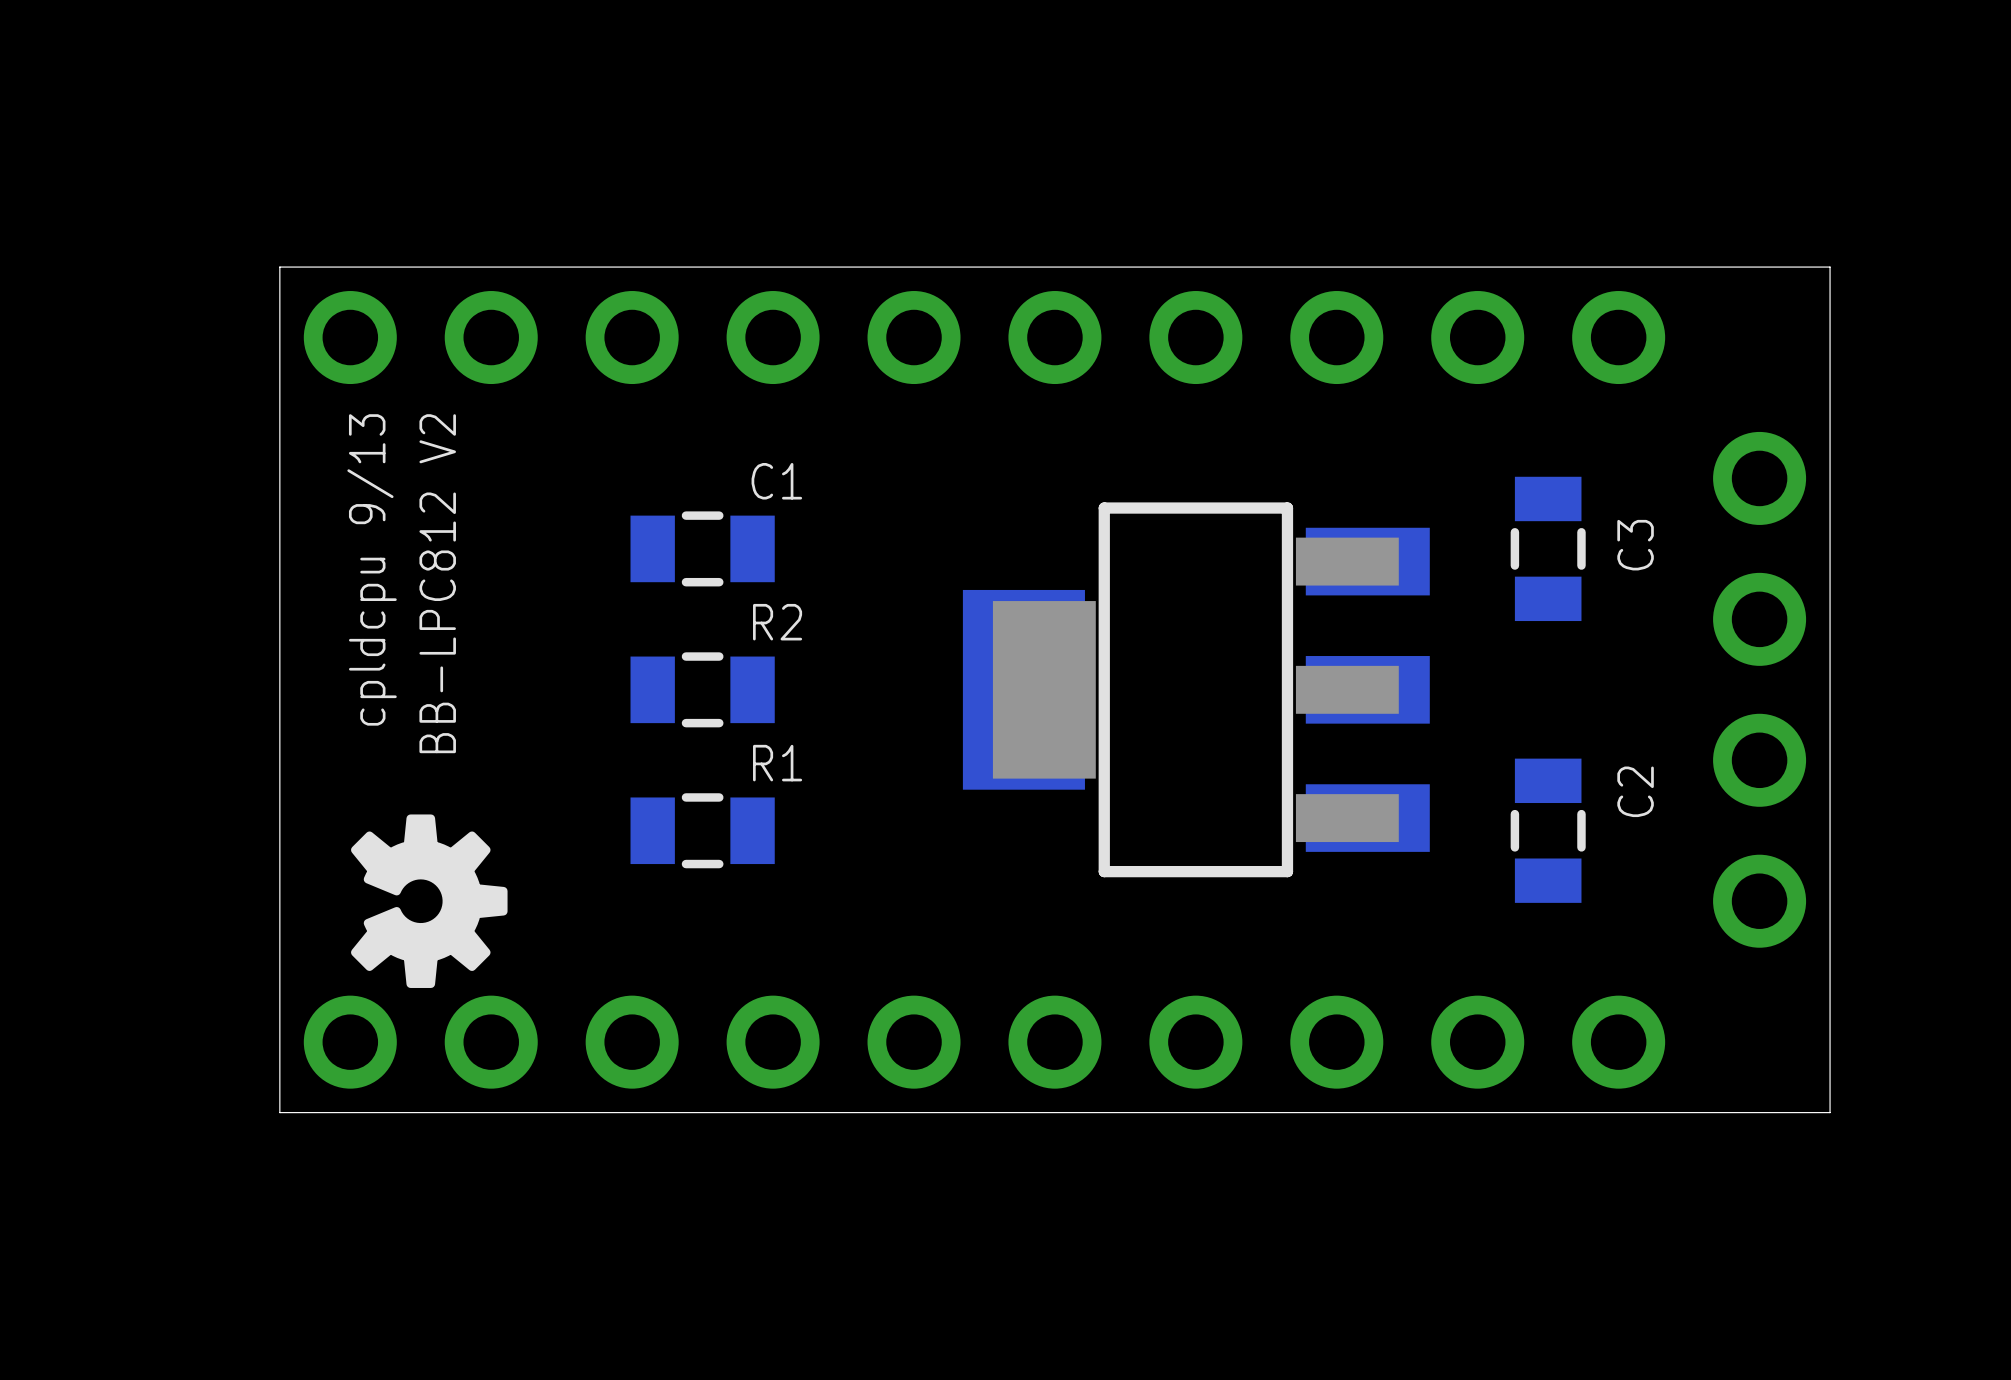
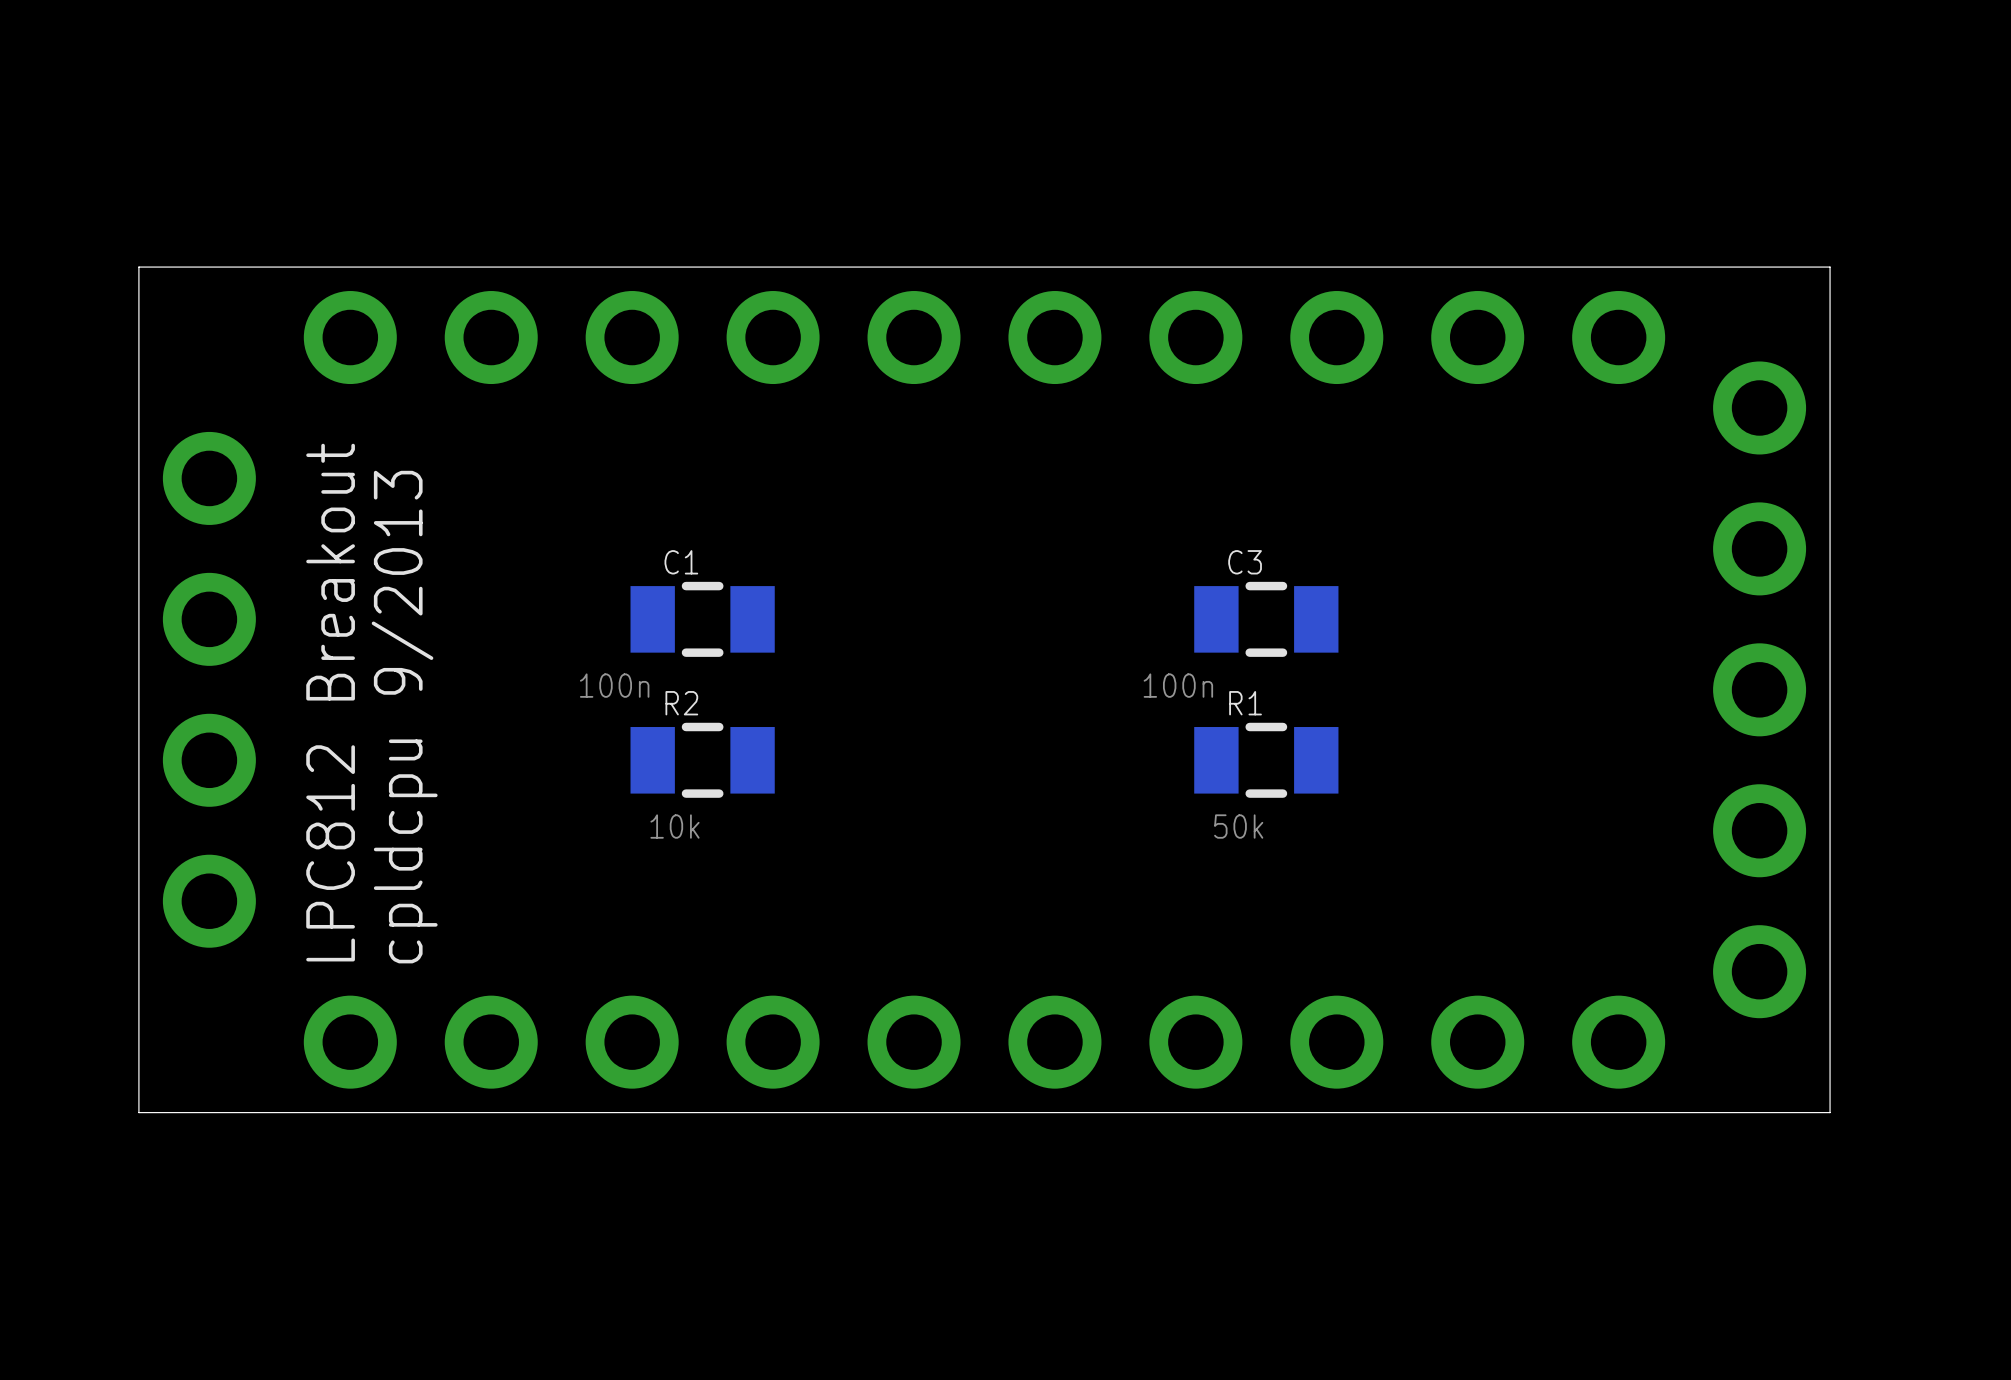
board edge: (279, 267) (279, 1112) -> (279, 267) (138, 267) (138, 1112) (279, 1112)
part footprint: [1713, 431, 1807, 948] -> [1713, 361, 1807, 1019]
text: C1 (776, 481) -> none
text: C3 (1635, 545) -> none
part: (702, 548) -> none
part: (1548, 548) -> none
text: cpldcpu 9/13 (372, 569) -> cpldcpu 9/2013 (404, 717)
text: BB-LPC812 V2 (437, 583) -> none
C1: none -> 100n (702, 619)
C3: none -> 100n (1266, 619)
text: R2 (777, 622) -> none
part: none -> (209, 689)
part: (702, 689) -> none
part: (1196, 689) -> none
text: none -> LPC812 Breakout (330, 702)
R2: none -> 10k (702, 760)
R1: none -> 50k (1266, 760)
text: R1 (777, 763) -> none
text: C2 (1635, 791) -> none
drawing: [351, 814, 508, 988] -> none
part: (702, 830) -> none
part: (1548, 830) -> none

